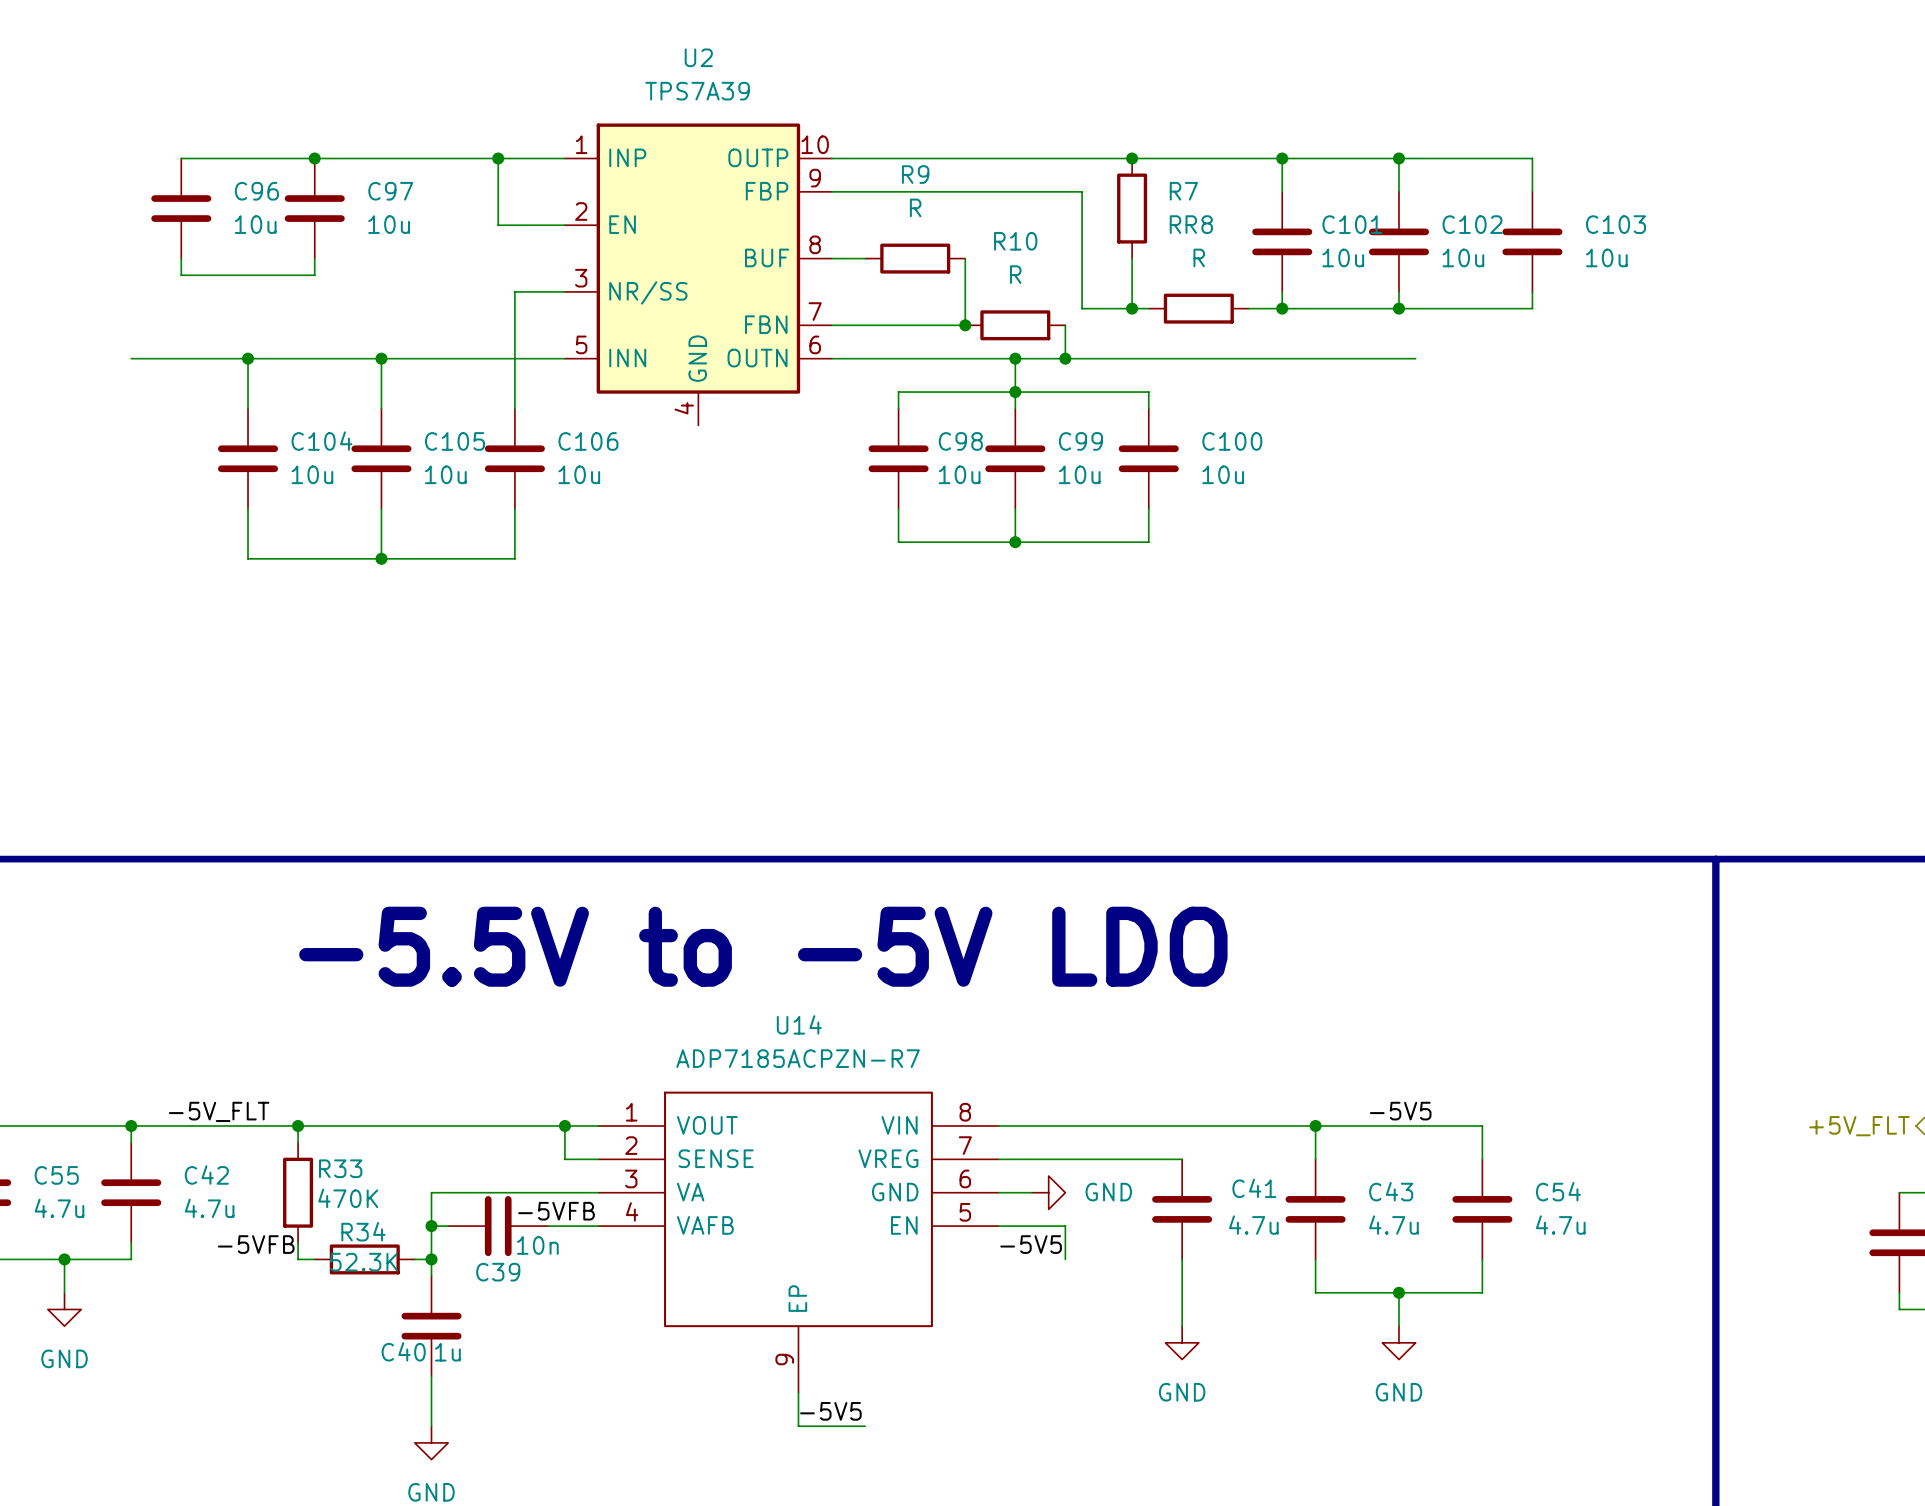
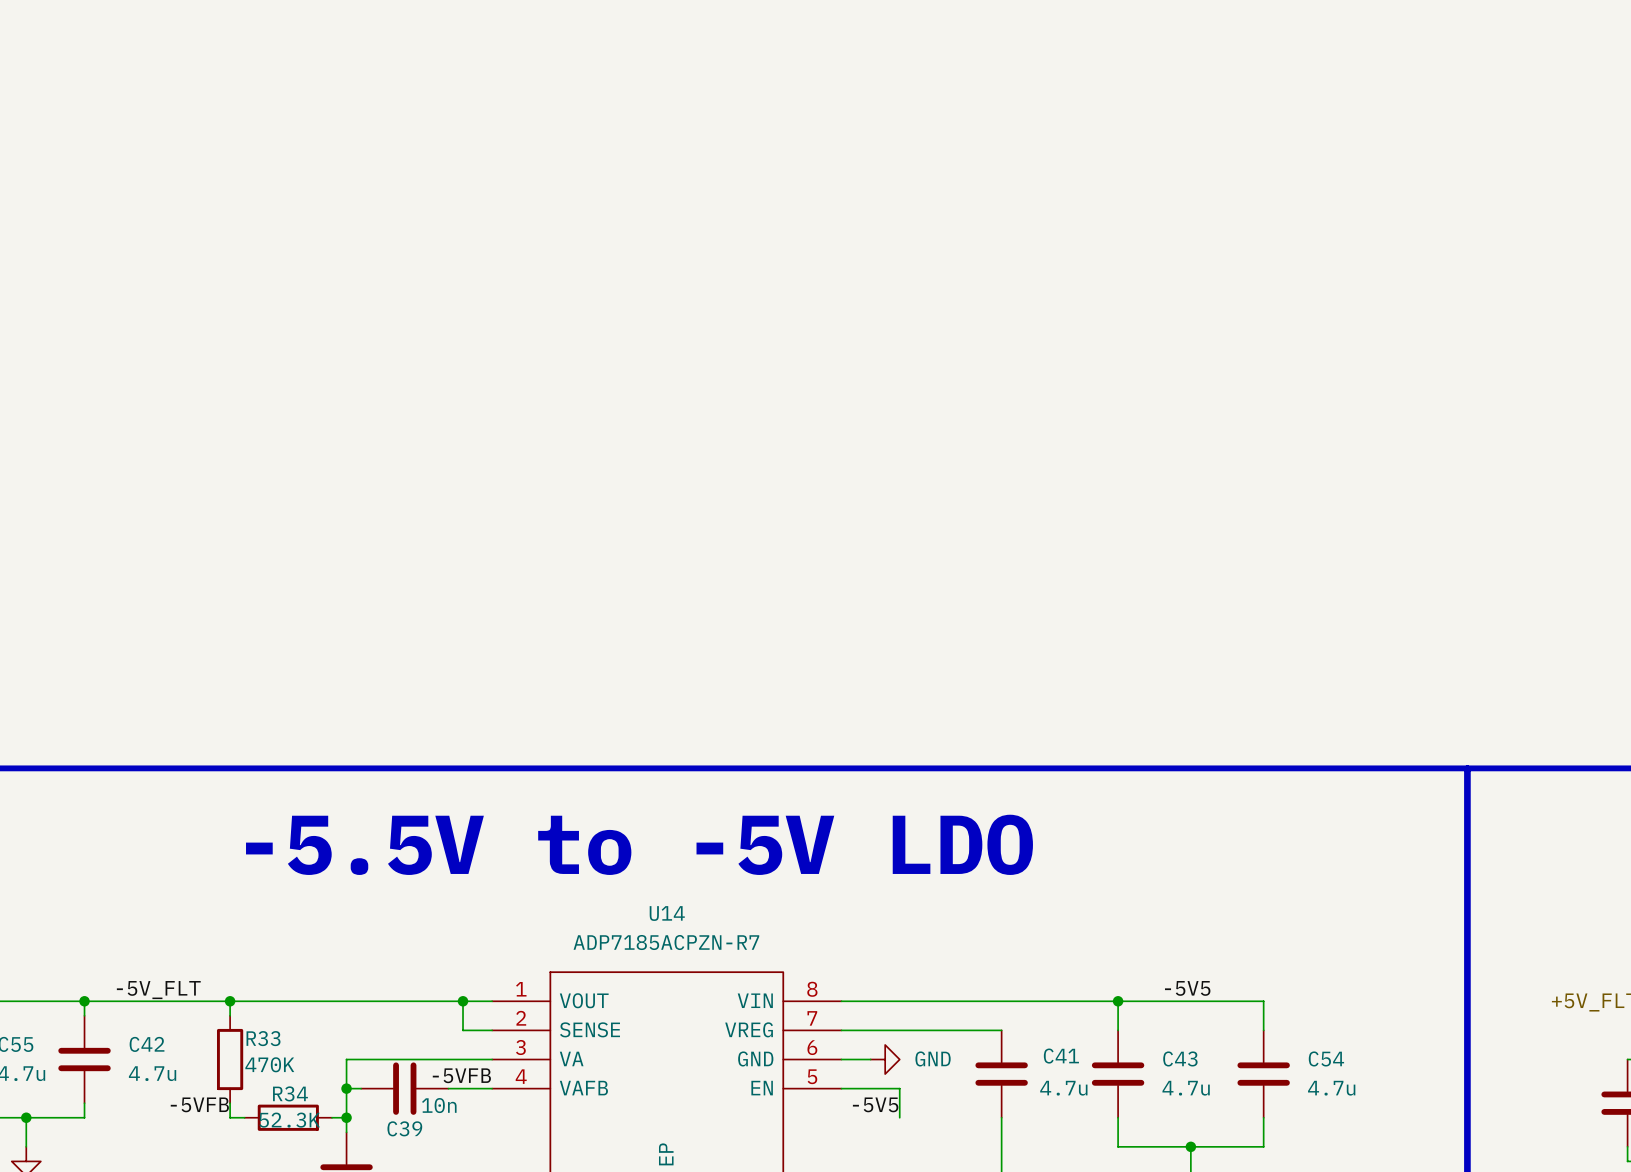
wire: (181, 158) (564, 158) -> none
junction: (314, 158) -> none
wire: (498, 158) (498, 225) (564, 225) -> none
junction: (498, 158) -> none
wire: (831, 158) (1532, 158) (1532, 191) -> none
junction: (1132, 158) -> none
wire: (1282, 158) (1282, 191) -> none
junction: (1282, 158) -> none
wire: (1398, 158) (1398, 191) -> none
junction: (1398, 158) -> none
wire: (831, 191) (1082, 191) (1082, 308) (1148, 308) -> none
C96: 10u (181, 208) -> none
C97: 10u (314, 208) -> none
R7: R (1132, 208) -> none
C101: 10u (1282, 241) -> none
C102: 10u (1398, 241) -> none
C103: 10u (1532, 241) -> none
wire: (181, 258) (181, 275) (314, 275) (314, 258) -> none
wire: (831, 258) (865, 258) -> none
R9: R (915, 258) -> none
wire: (965, 258) (965, 325) (831, 325) -> none
wire: (1132, 258) (1132, 308) -> none
U2: TPS7A39 (698, 274) -> none
wire: (564, 291) (514, 291) (514, 408) -> none
wire: (1282, 291) (1282, 308) -> none
wire: (1398, 291) (1398, 308) -> none
wire: (1532, 291) (1532, 308) (1248, 308) -> none
junction: (1132, 308) -> none
R8: R (1198, 308) -> none
junction: (1282, 308) -> none
junction: (1398, 308) -> none
junction: (965, 325) -> none
R10: R (1015, 325) -> none
wire: (1065, 325) (1065, 358) -> none
wire: (131, 358) (564, 358) -> none
wire: (248, 358) (248, 408) -> none
junction: (248, 358) -> none
wire: (381, 358) (381, 408) -> none
junction: (381, 358) -> none
wire: (831, 358) (1415, 358) -> none
wire: (1015, 358) (1015, 408) -> none
junction: (1015, 358) -> none
junction: (1065, 358) -> none
junction: (1015, 392) -> none
wire: (898, 408) (898, 392) (1148, 392) (1148, 408) -> none
C104: 10u (248, 458) -> none
C105: 10u (381, 458) -> none
C106: 10u (514, 458) -> none
C98: 10u (898, 458) -> none
C99: 10u (1015, 458) -> none
C100: 10u (1148, 458) -> none
wire: (248, 508) (248, 558) (514, 558) (514, 508) -> none
wire: (381, 508) (381, 558) -> none
wire: (898, 508) (898, 542) (1148, 542) (1148, 508) -> none
wire: (1015, 508) (1015, 542) -> none
junction: (1015, 542) -> none
junction: (381, 558) -> none

